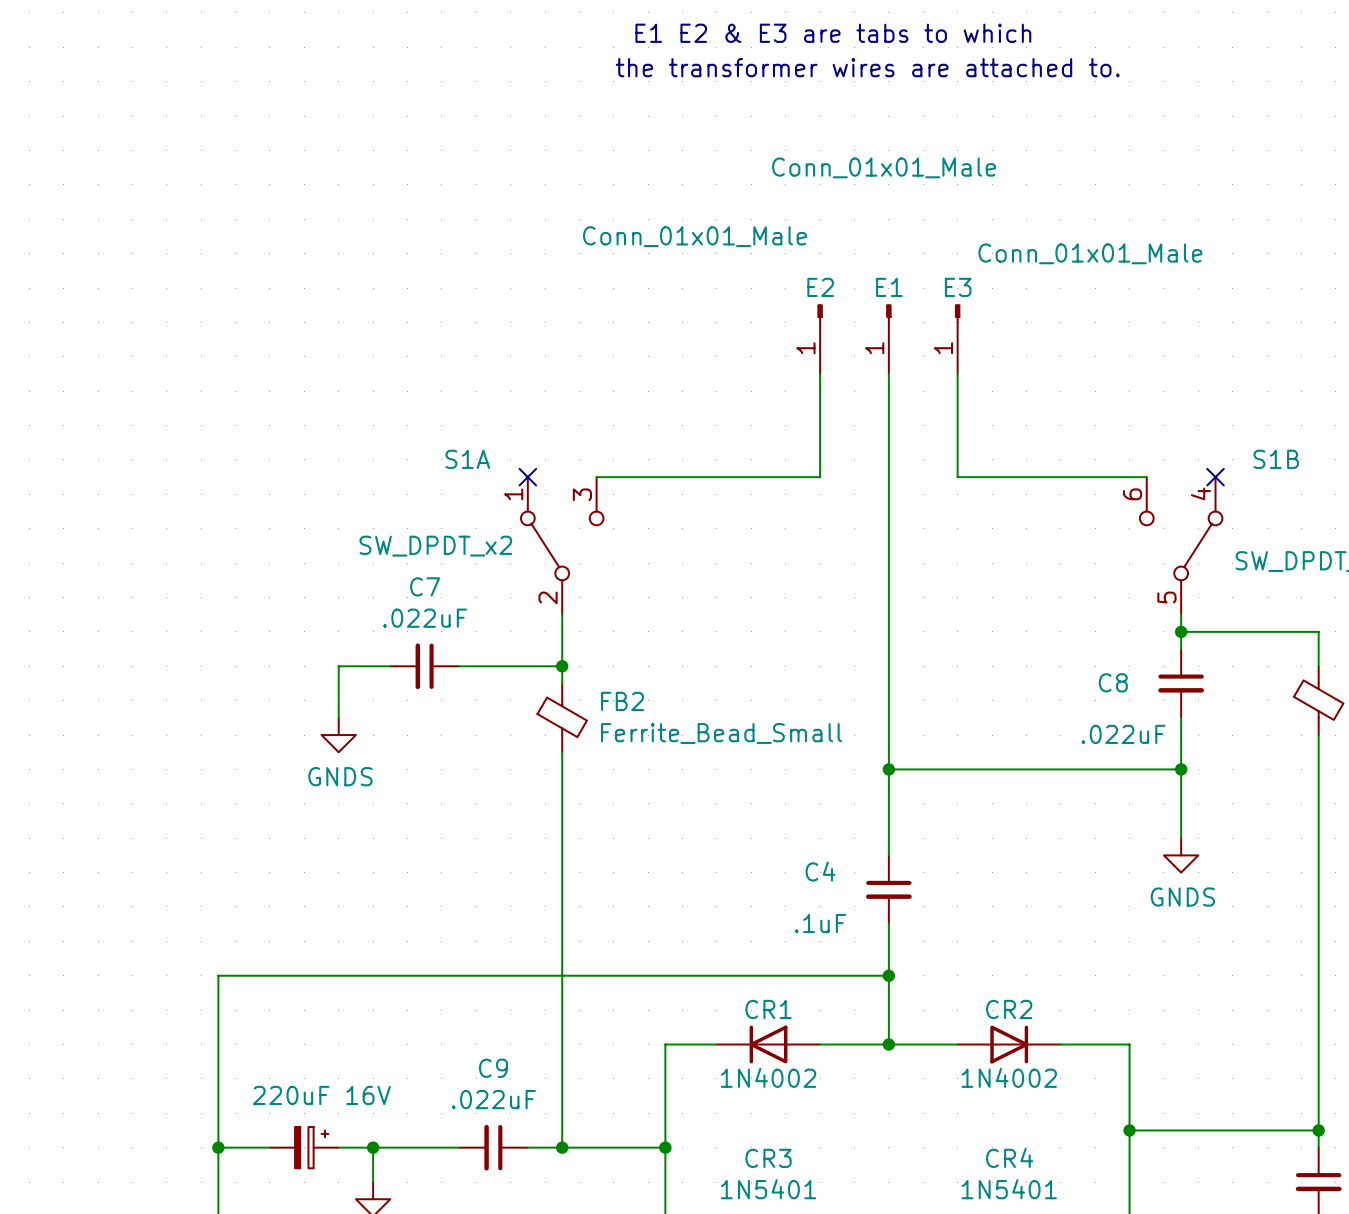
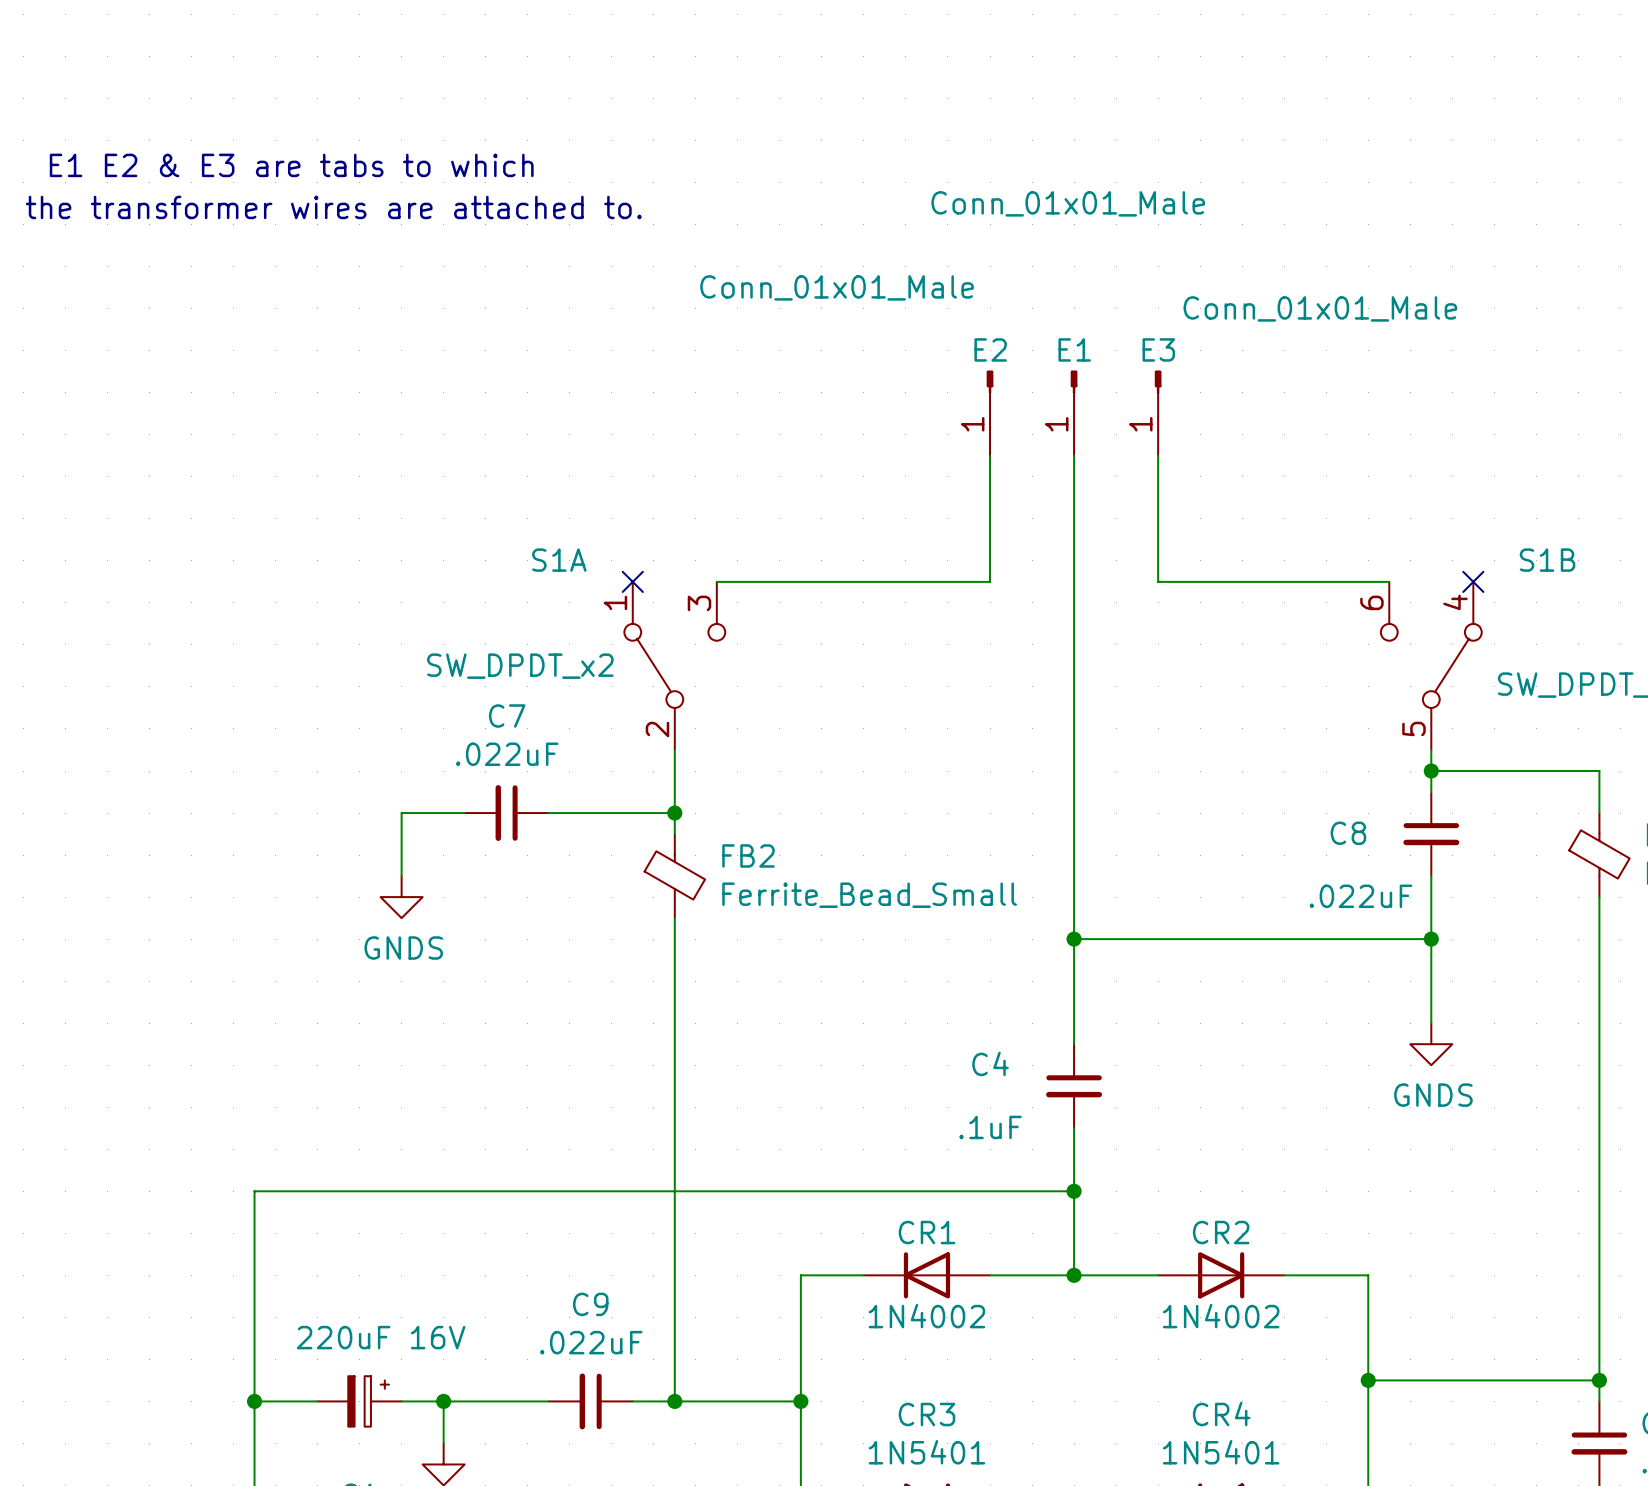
text: E1 E2 & E3 are tabs to which (833, 33) -> none
text: the transformer wires are attached to. (867, 67) -> none
text: none -> E1 E2 & E3 are tabs to which (291, 165)
text: none -> the transformer wires are attached to. (333, 207)

